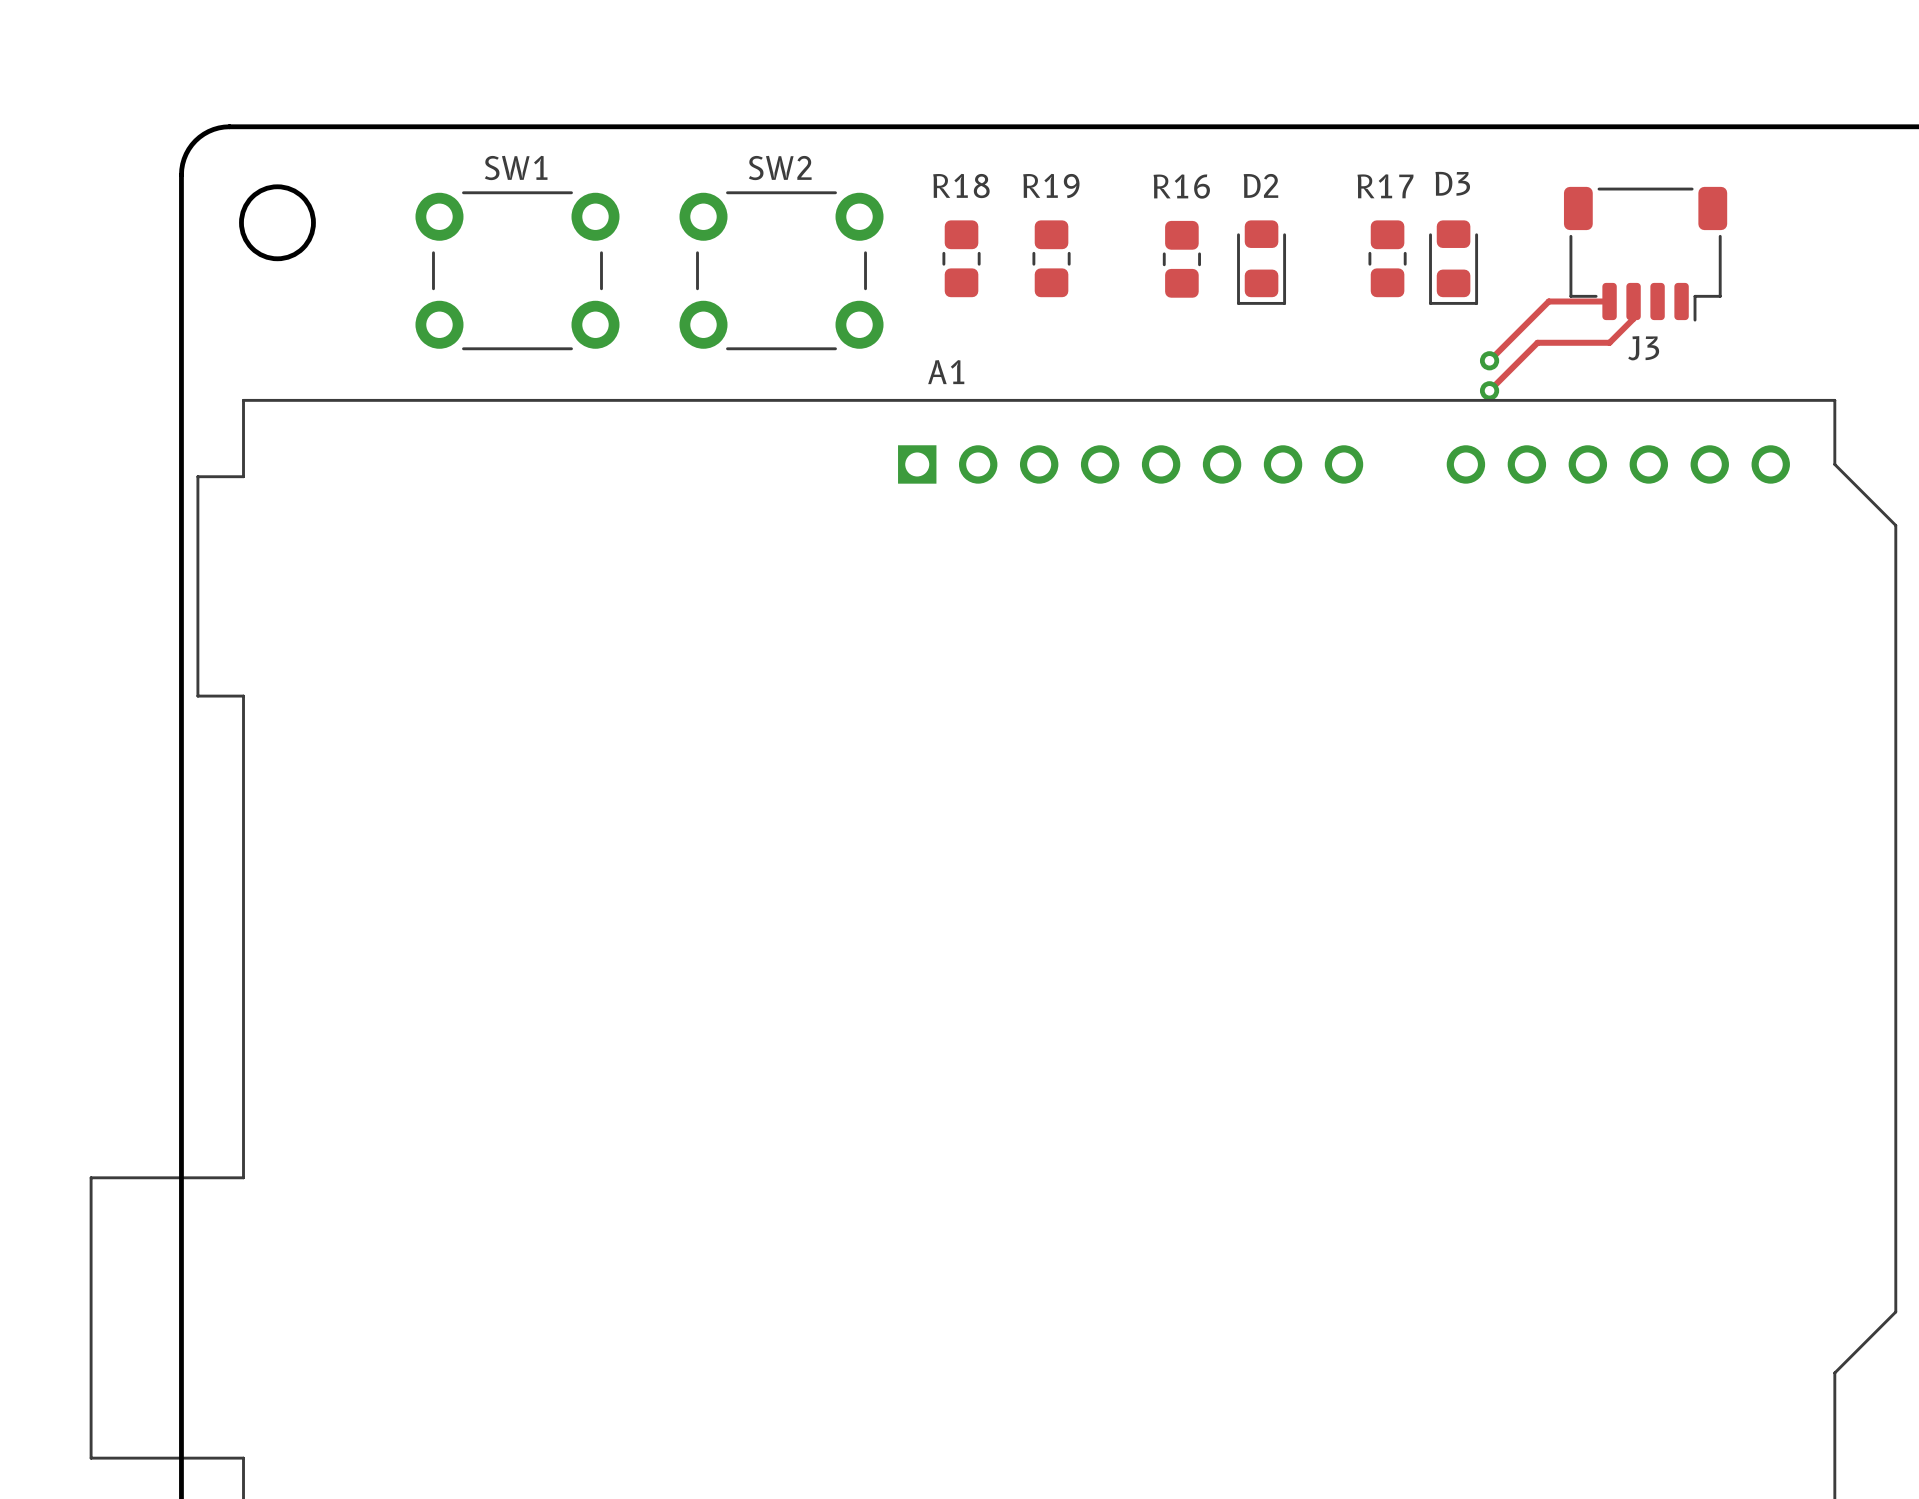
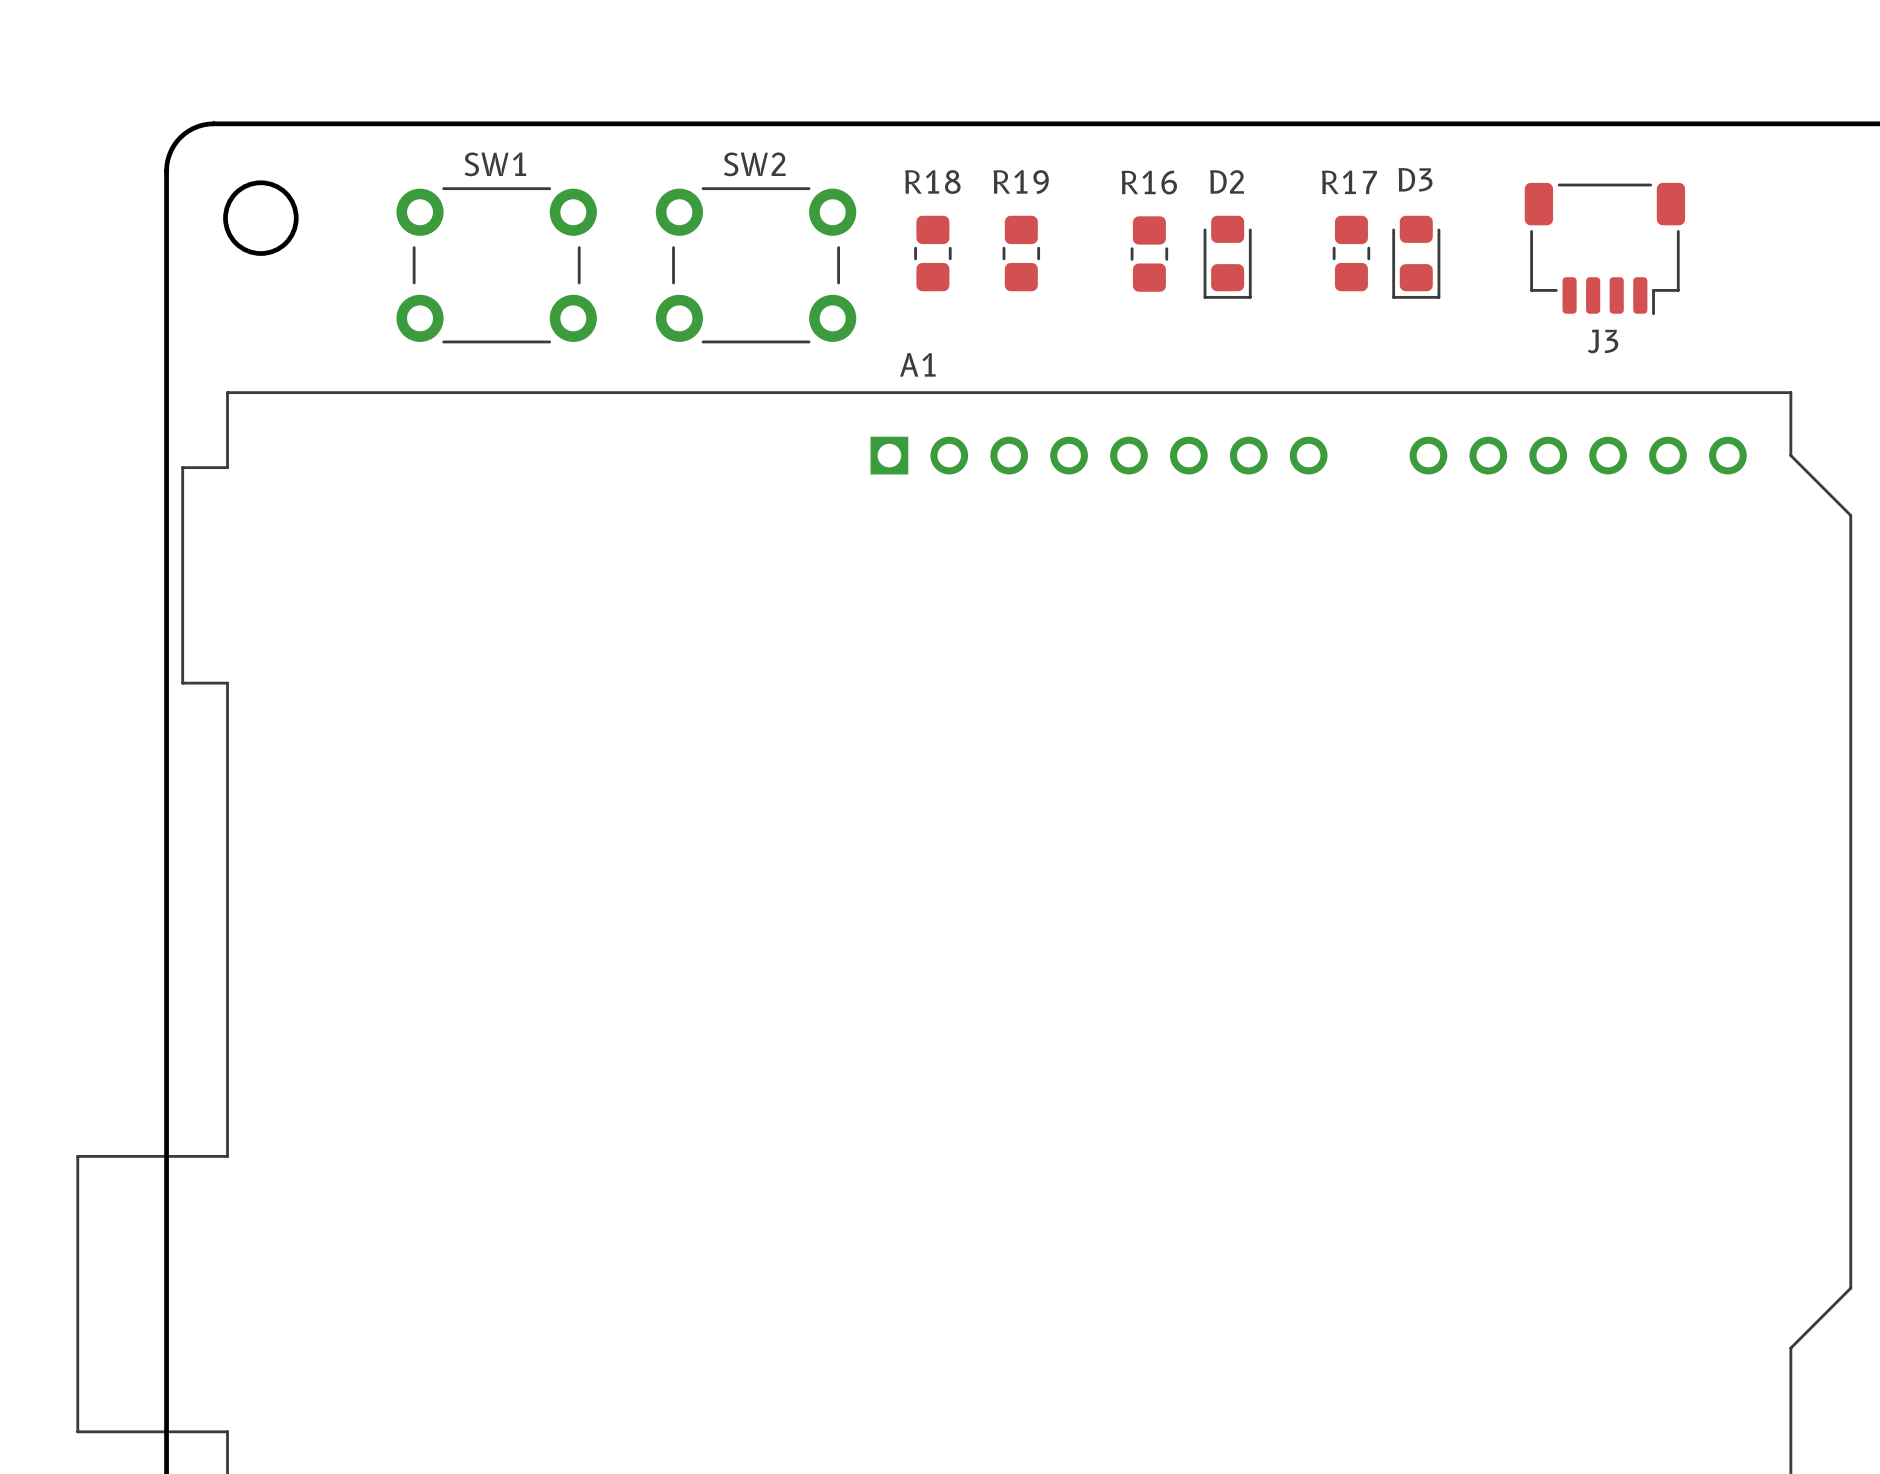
track: (1609, 301) (1548, 301) (1489, 360) -> none
track: (1633, 301) (1633, 318) (1609, 342) (1537, 342) (1489, 390) -> none
via: (1489, 360) -> none
via: (1489, 390) -> none

